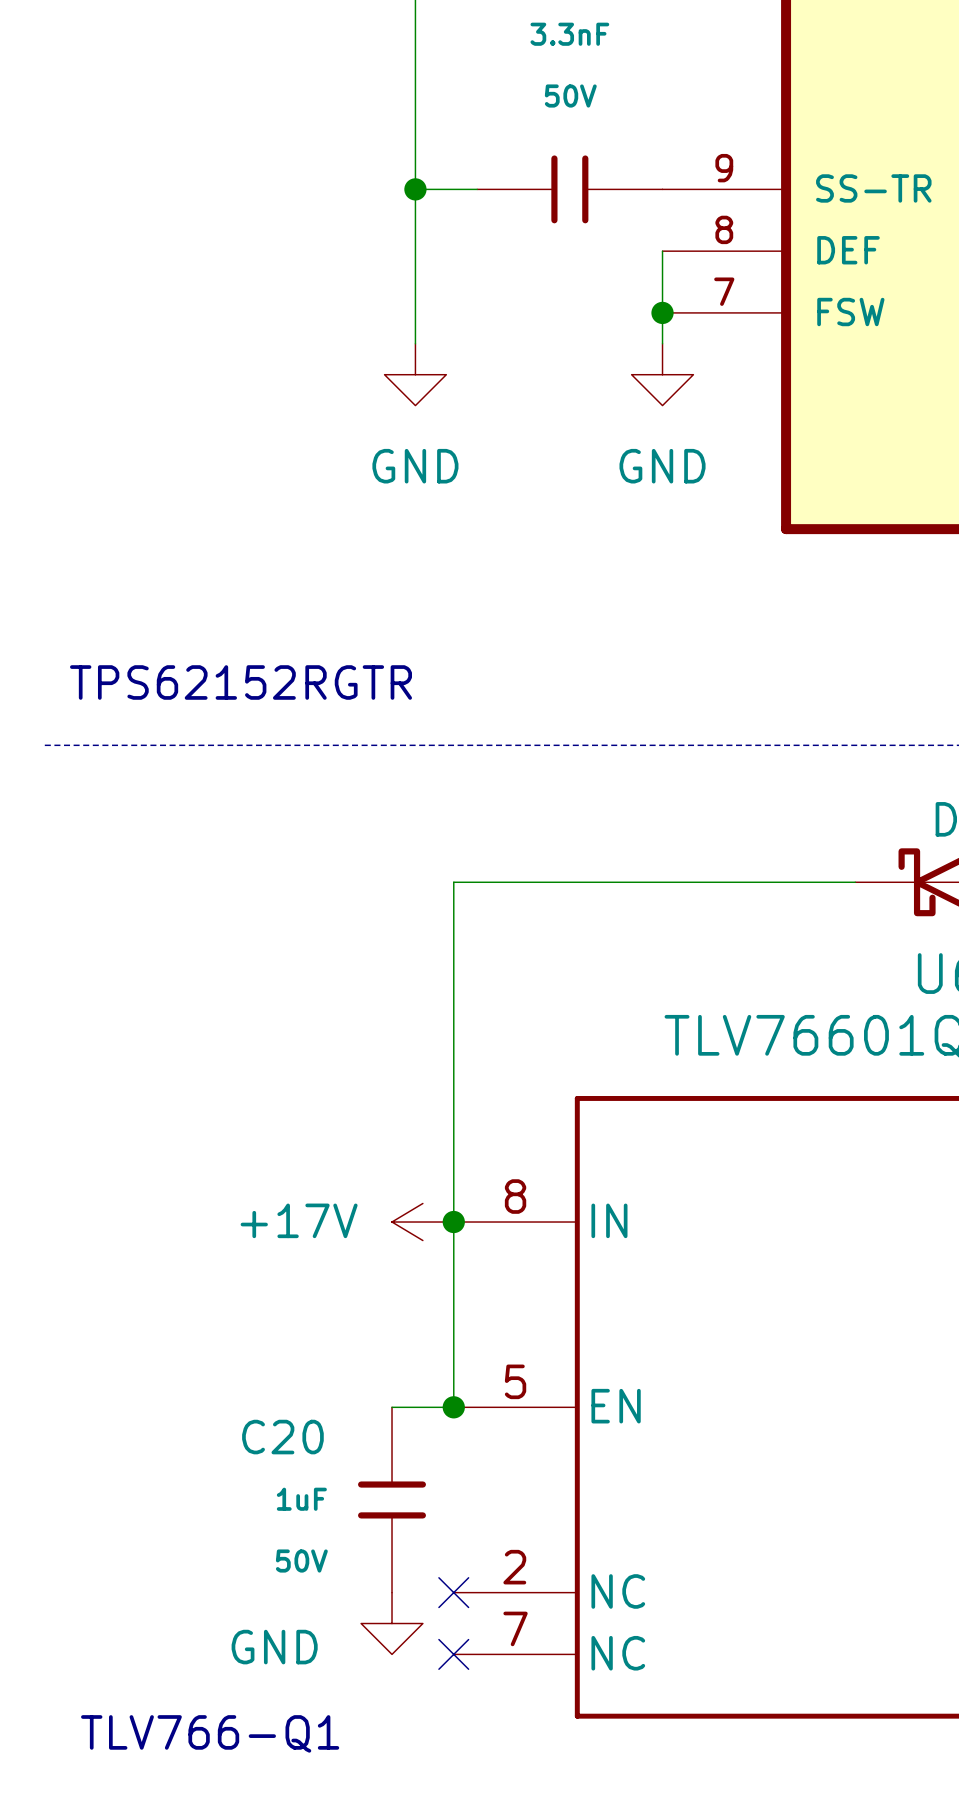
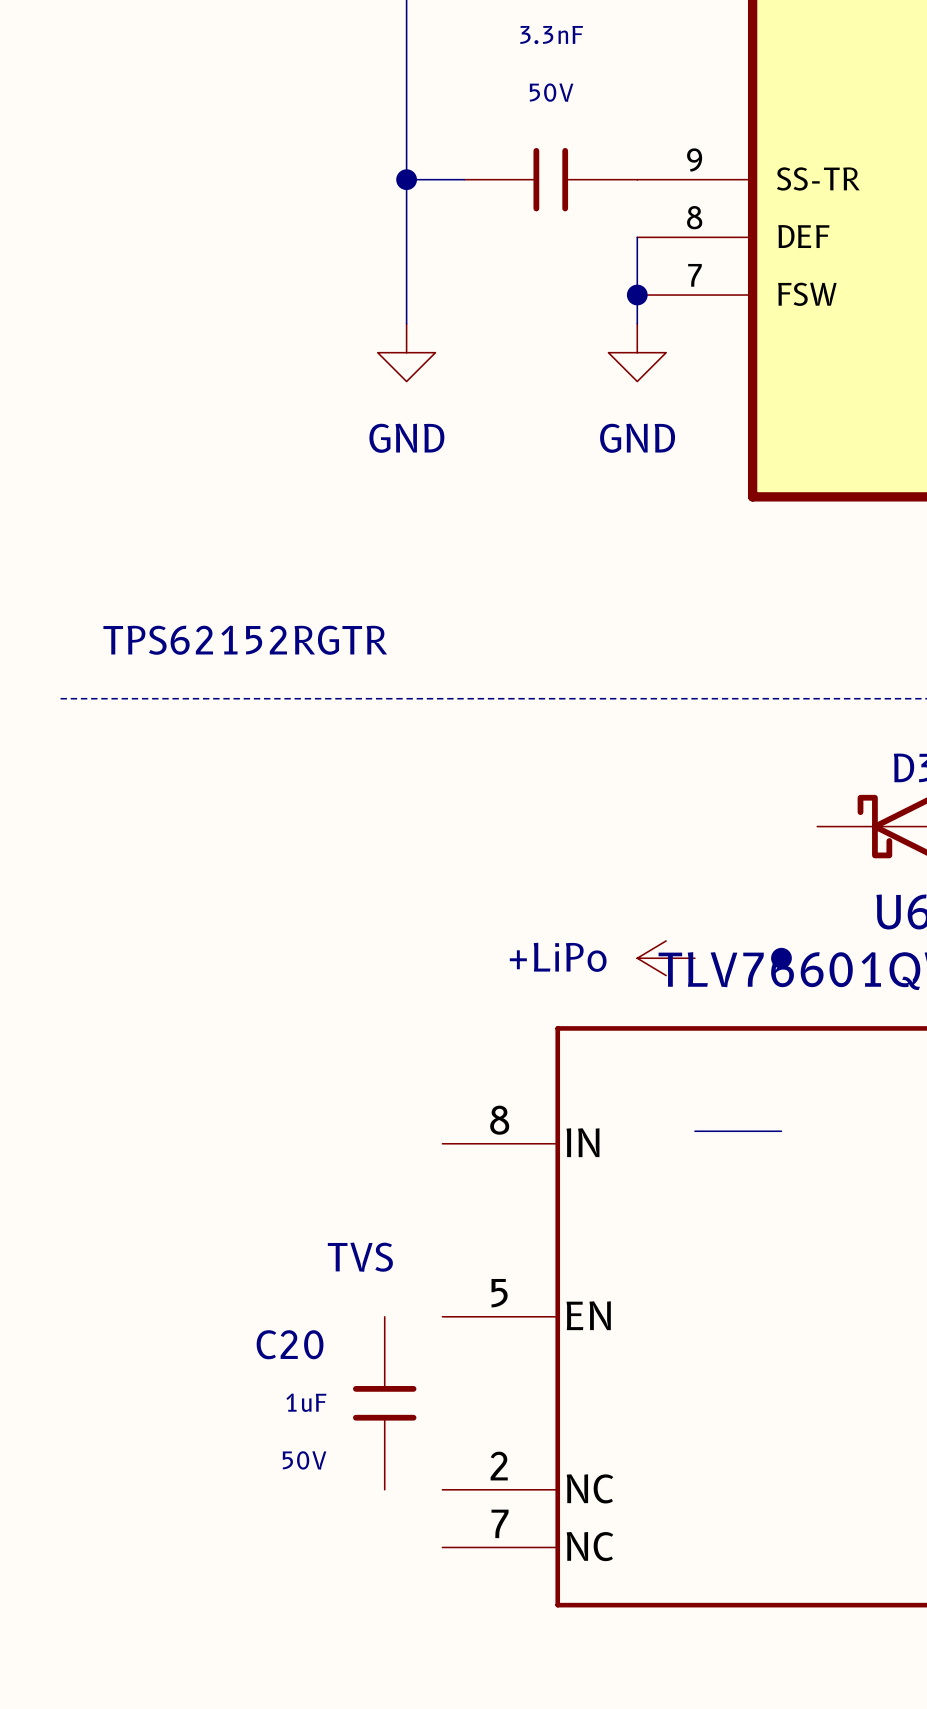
wire: (855, 882) (453, 882) (453, 1407) (392, 1407) -> none
power symbol: none -> +LiPo (666, 958)
junction: none -> (781, 958)
wire: none -> (694, 1131) (781, 1131)
power symbol: +17V (422, 1222) -> none
junction: (453, 1222) -> none
text: none -> TVS (360, 1257)
junction: (453, 1407) -> none
no-connect mark: (453, 1592) -> none
power symbol: GND (392, 1623) -> none
no-connect mark: (453, 1654) -> none
text: TLV766-Q1 (210, 1733) -> none

